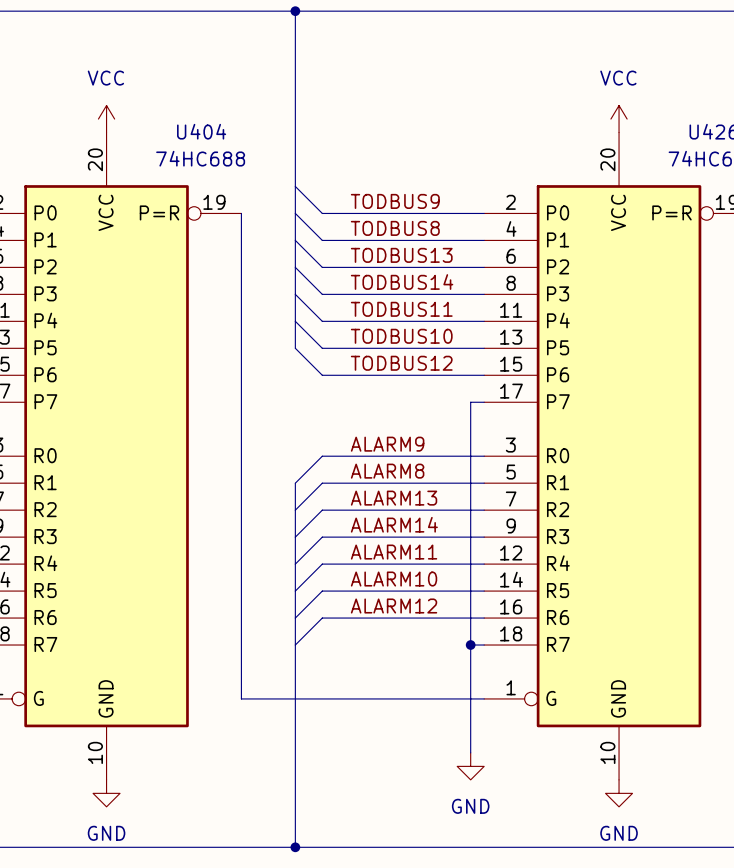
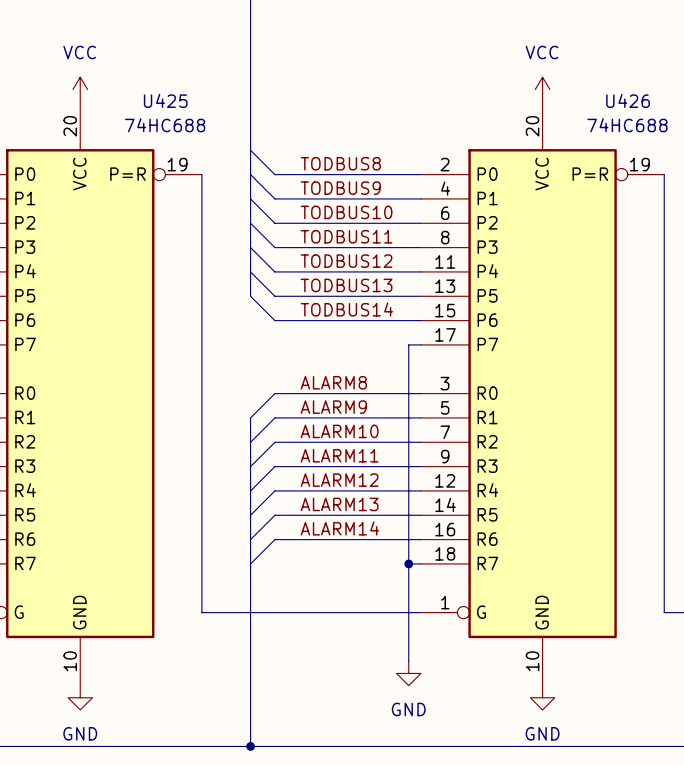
U404 name: U404 (201, 131) -> U425 (165, 100)
label: TODBUS9 (395, 201) -> TODBUS8 (340, 163)
label: TODBUS8 (395, 228) -> TODBUS9 (340, 188)
label: TODBUS13 (401, 255) -> TODBUS10 (346, 212)
label: TODBUS14 (402, 282) -> TODBUS11 (346, 236)
label: TODBUS11 (401, 309) -> TODBUS12 (346, 261)
label: TODBUS10 (401, 336) -> TODBUS13 (346, 285)
label: TODBUS12 (401, 363) -> TODBUS14 (346, 309)
label: ALARM9 (387, 444) -> ALARM8 (333, 382)
label: ALARM8 (387, 471) -> ALARM9 (333, 407)
label: ALARM13 (394, 498) -> ALARM10 (339, 431)
label: ALARM14 (394, 524) -> ALARM11 (339, 455)
label: ALARM11 (394, 552) -> ALARM12 (339, 480)
label: ALARM10 (394, 579) -> ALARM13 (339, 504)
label: ALARM12 (394, 606) -> ALARM14 (339, 528)

